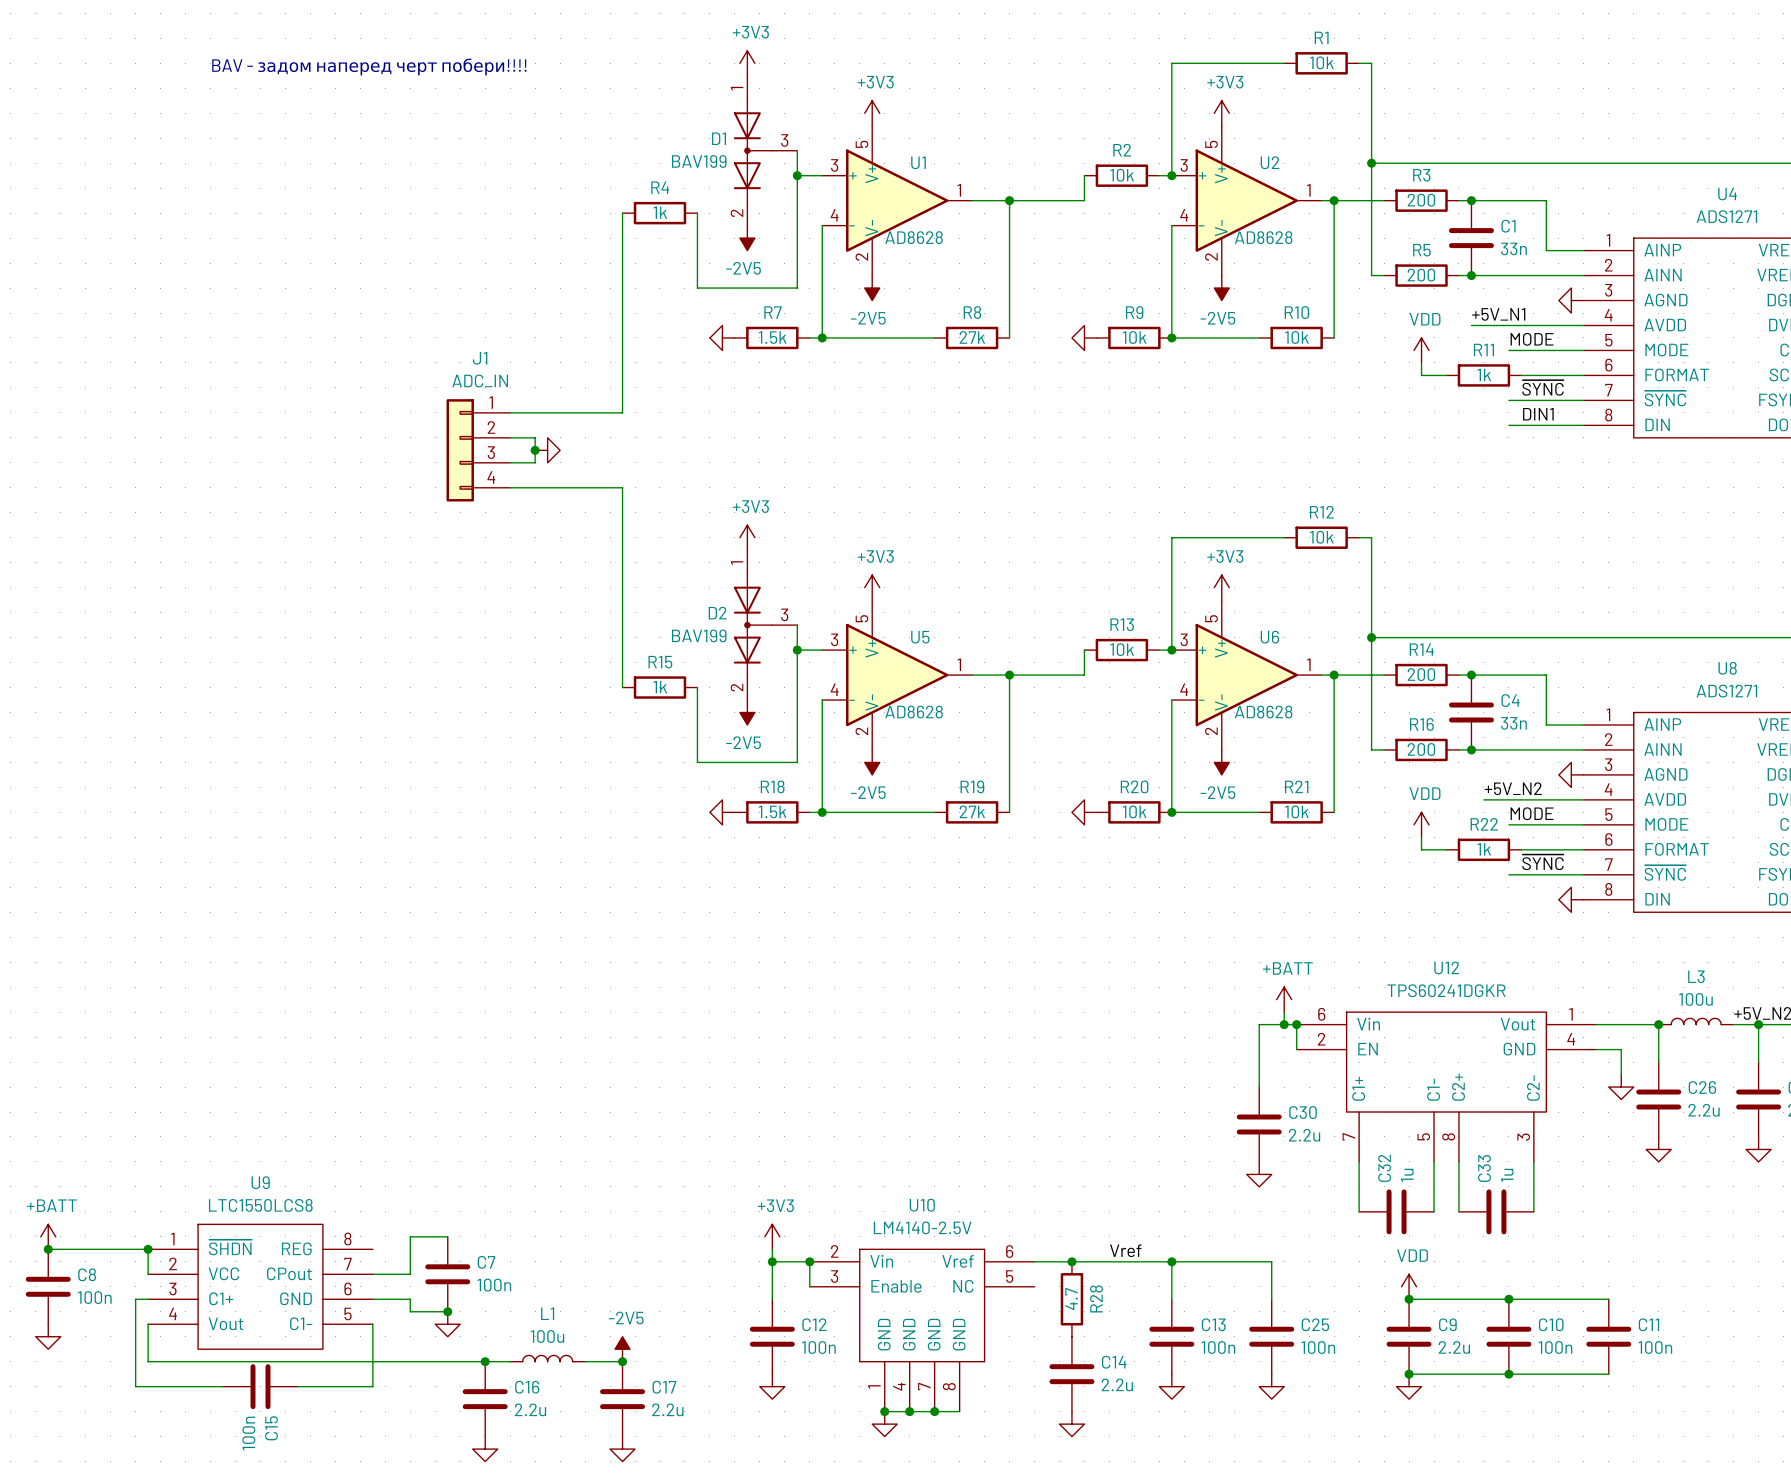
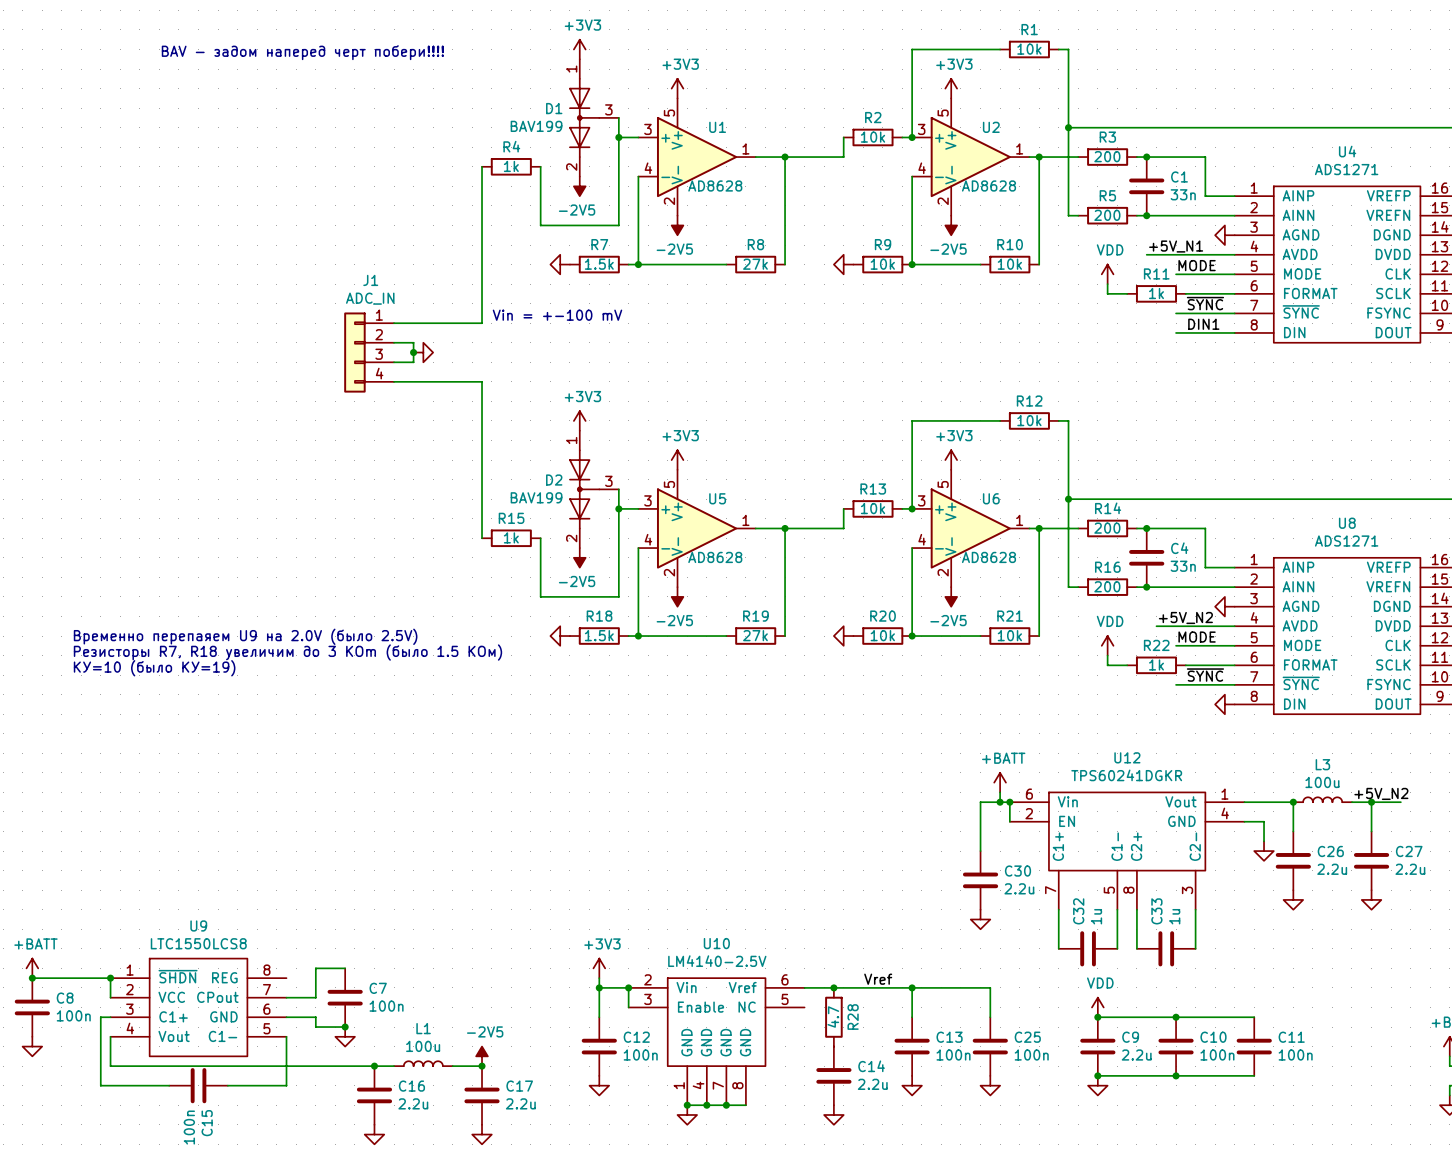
text: none -> Vin = +-100 mV (557, 315)
text: none -> Временно перепаяем U9 на 2.0V (было 2.5V) (245, 636)
text: none -> Резисторы R7, R18 увеличим до 3 KOm (было 1.5 КОм) (287, 652)
text: none -> КУ=10 (было КУ=19) (154, 668)

